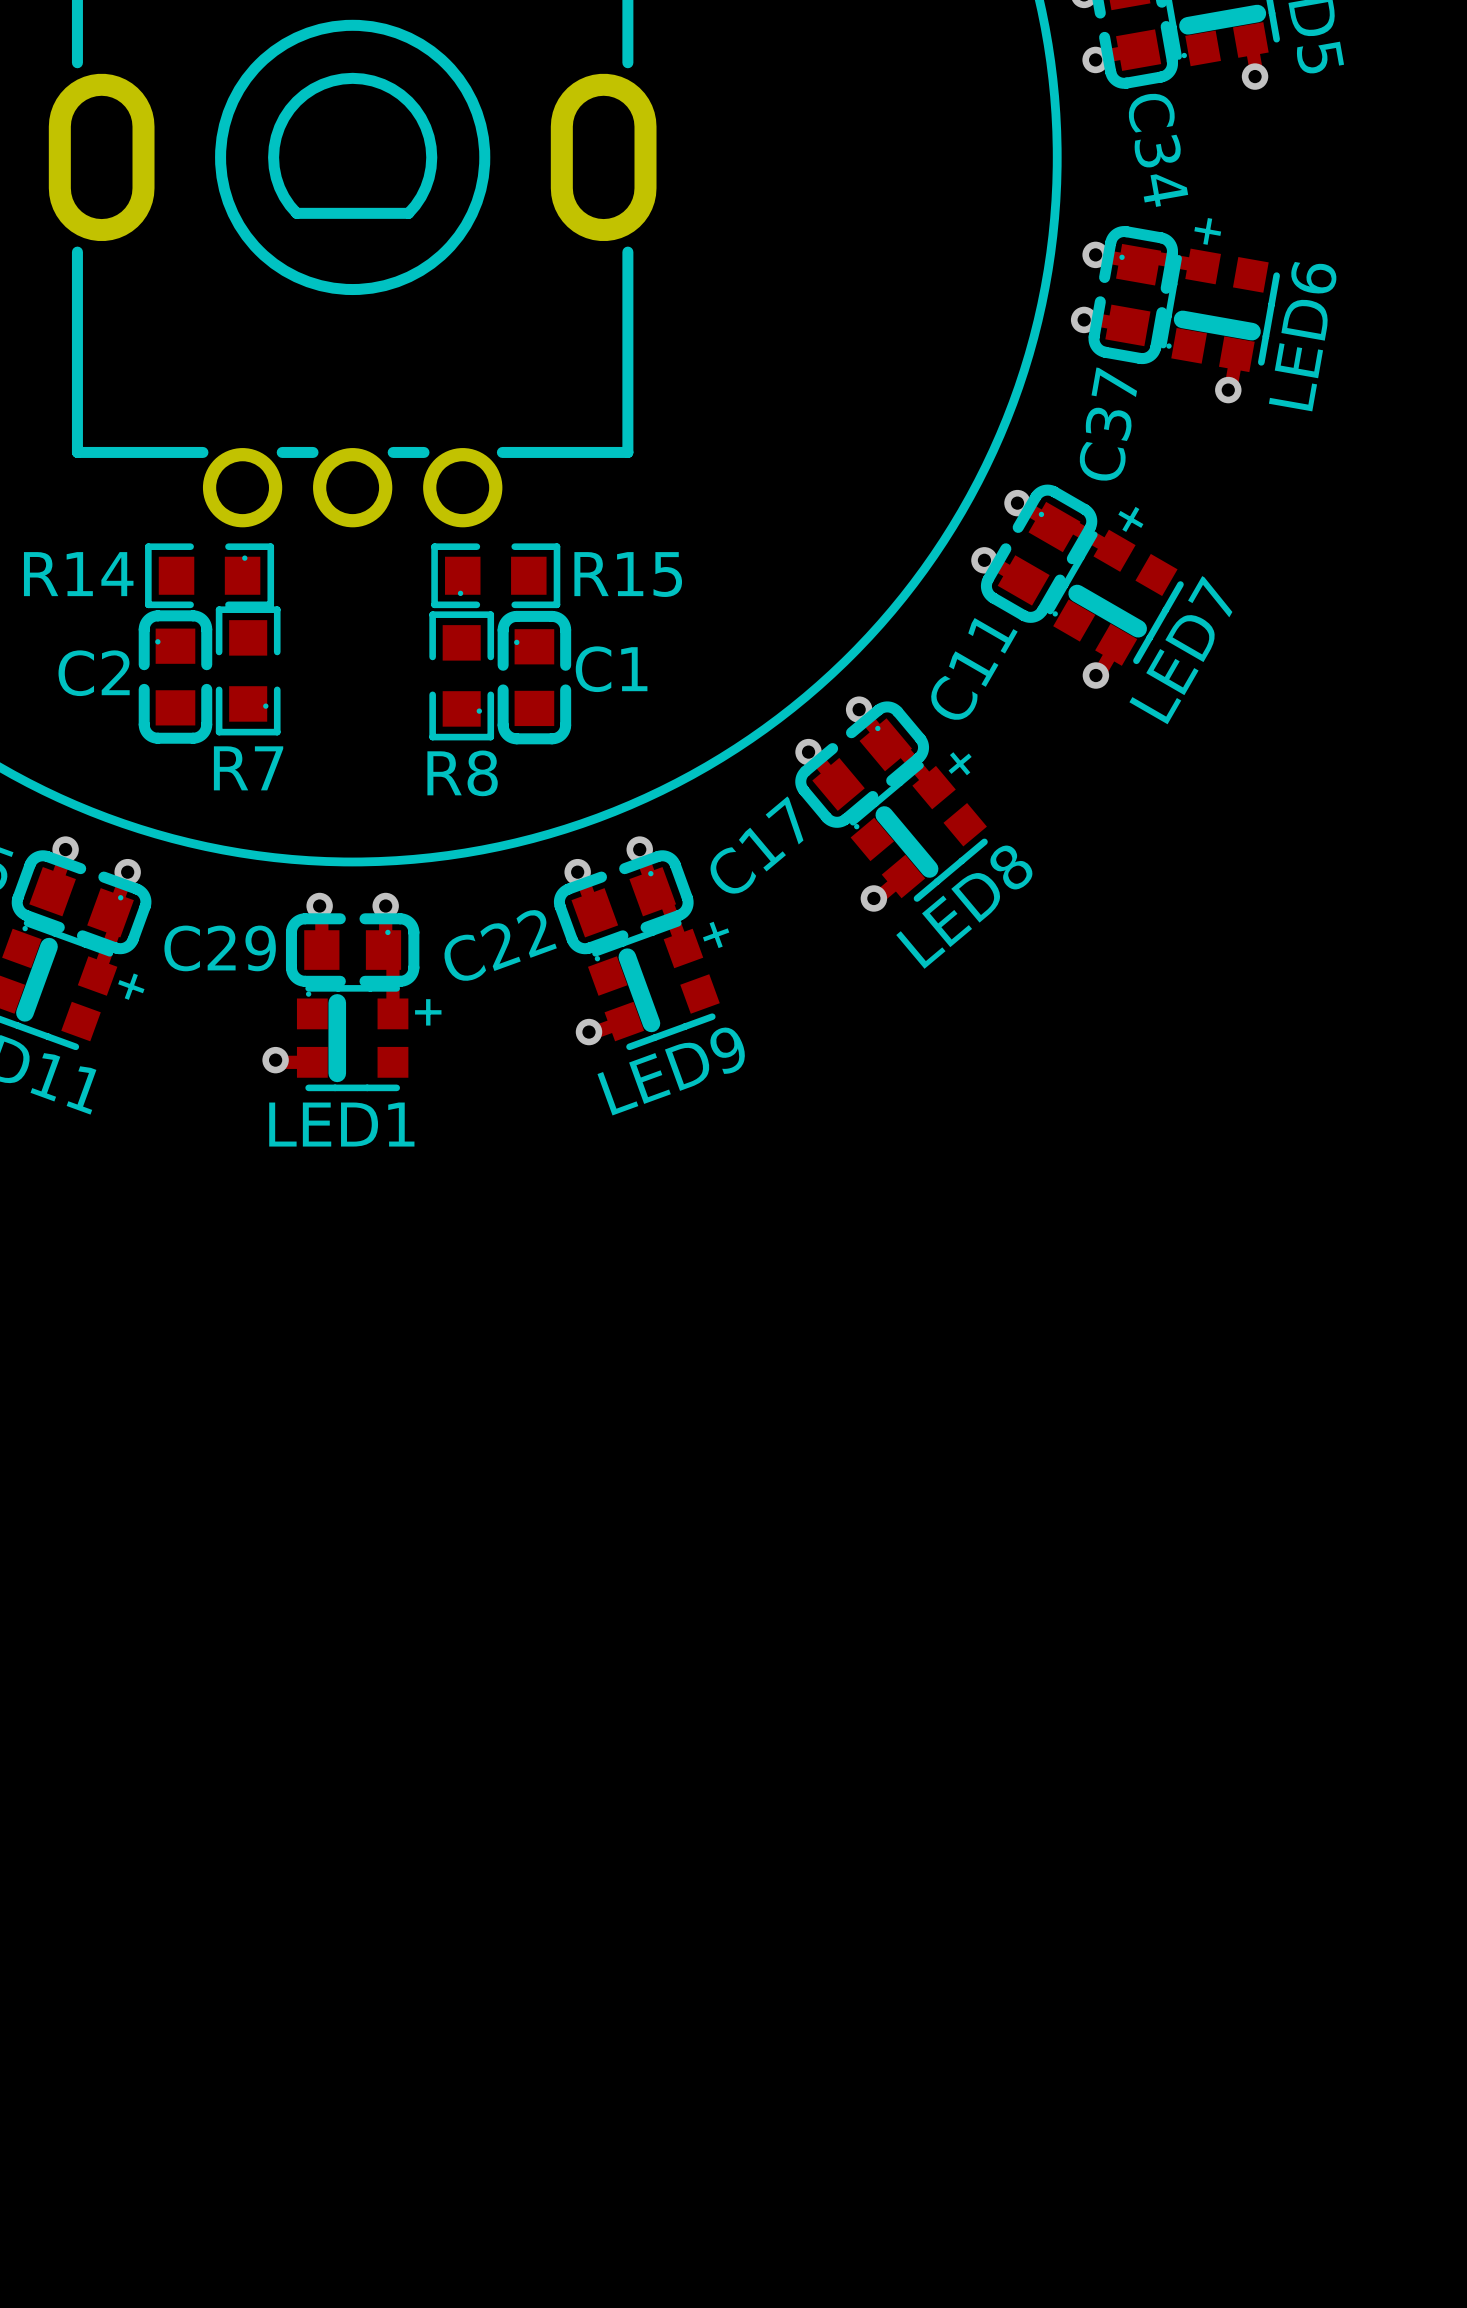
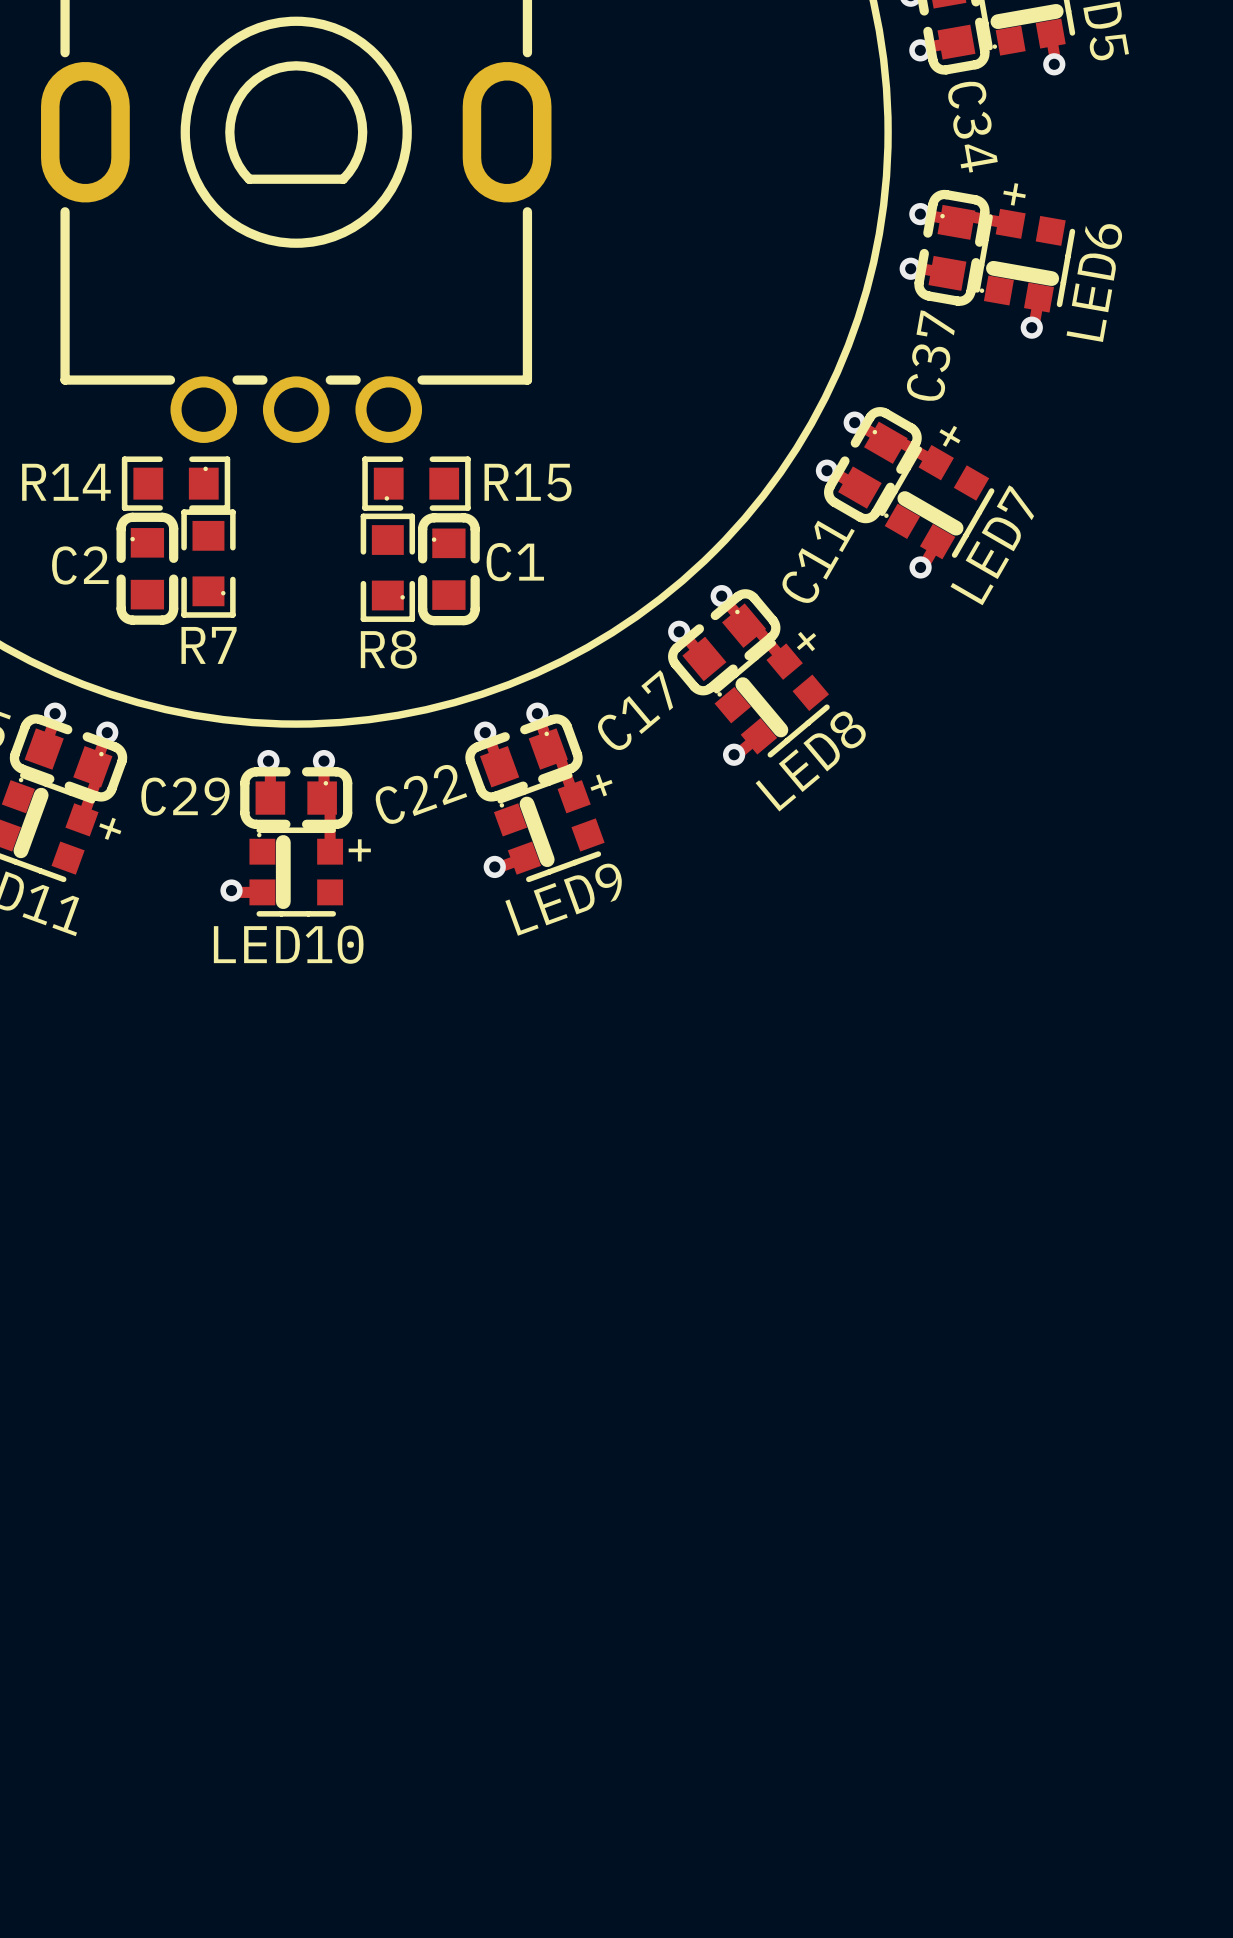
LED1 name: LED1 (341, 1124) -> LED10 (288, 944)

